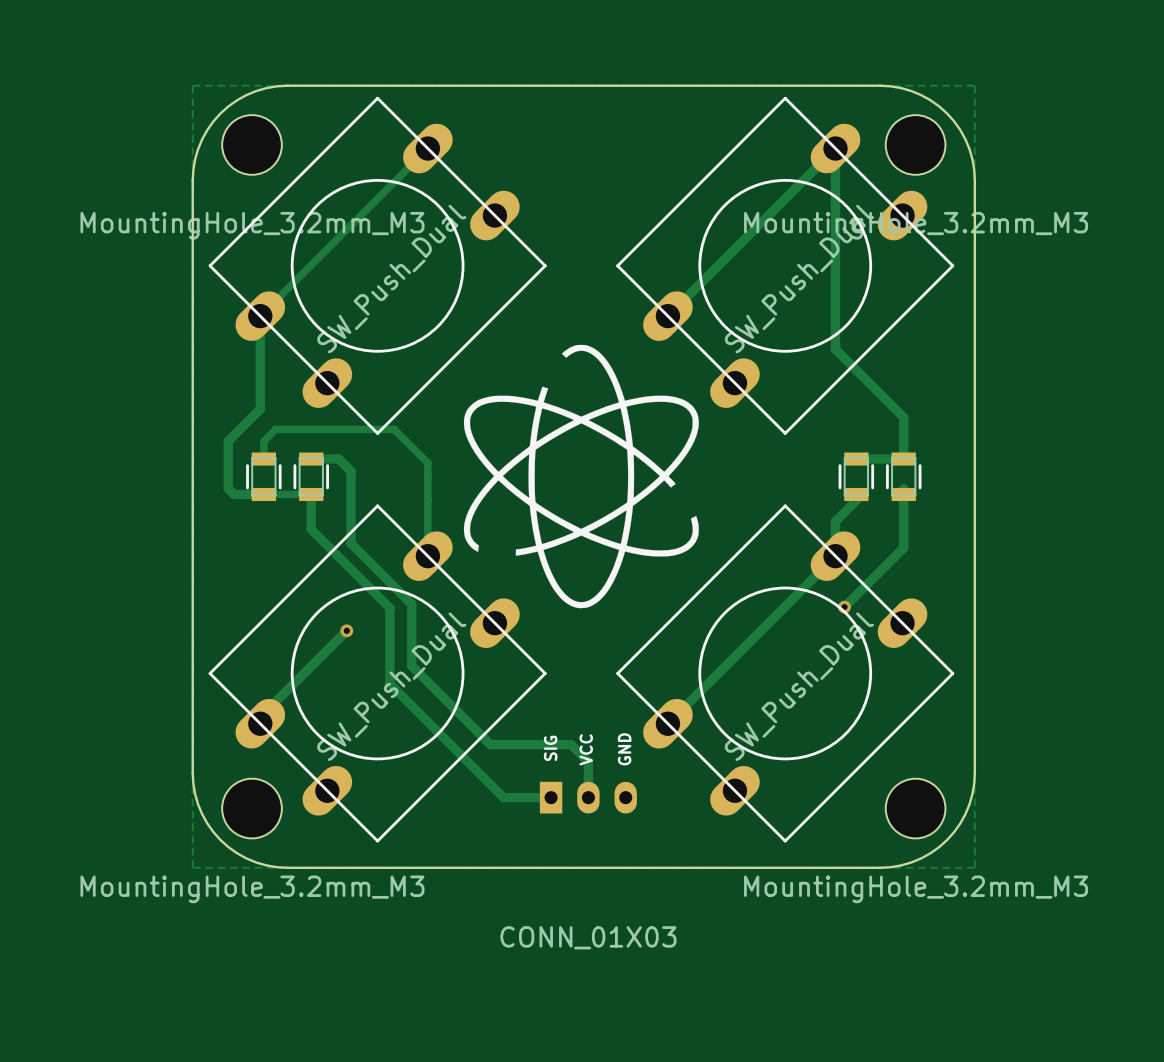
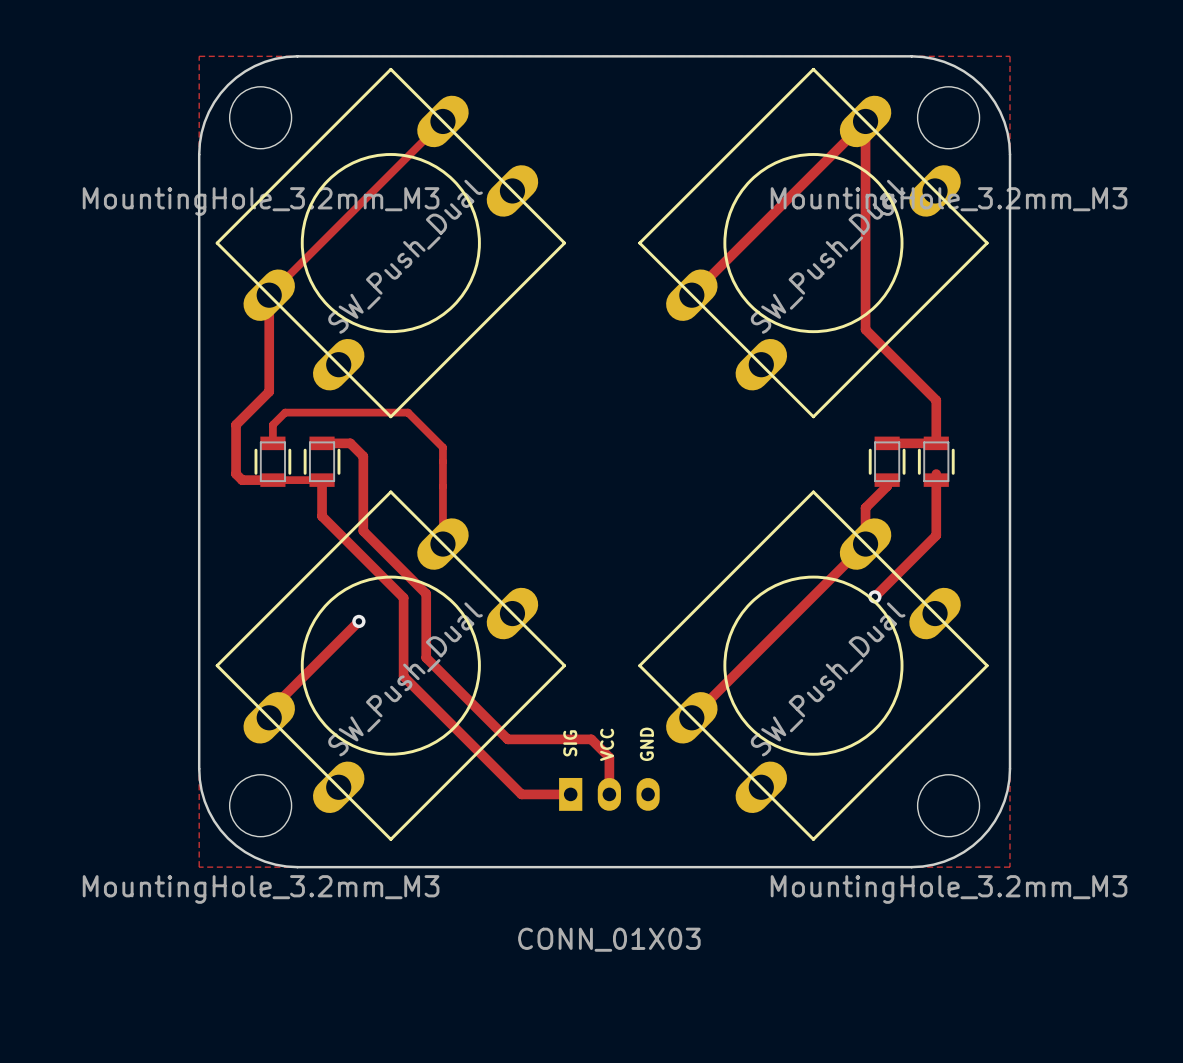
drawing: [463, 344, 699, 609] -> none

